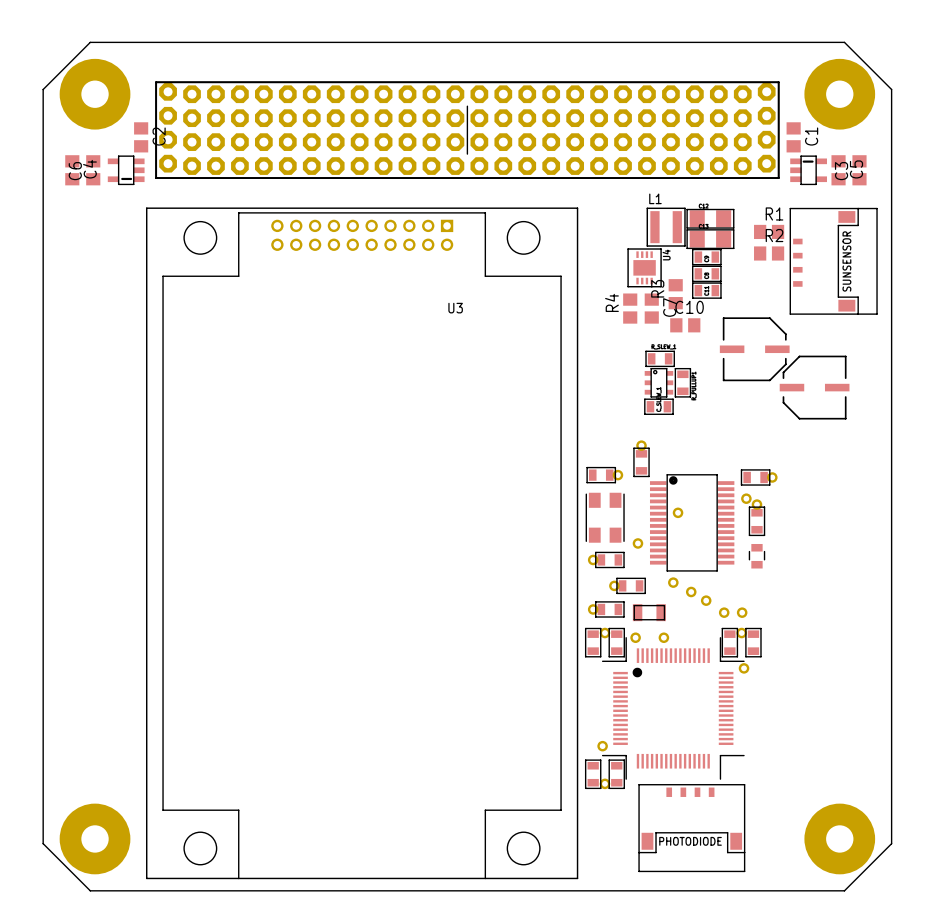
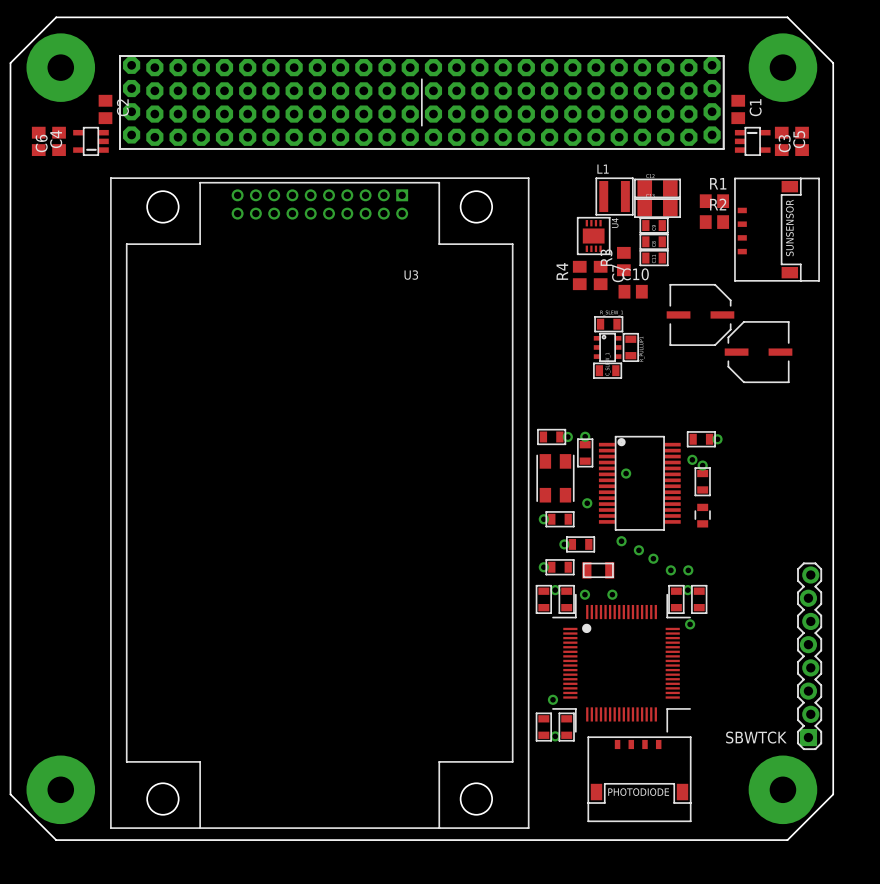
part: (681, 614) -> none
part: none -> (629, 585)
part: none -> (809, 656)

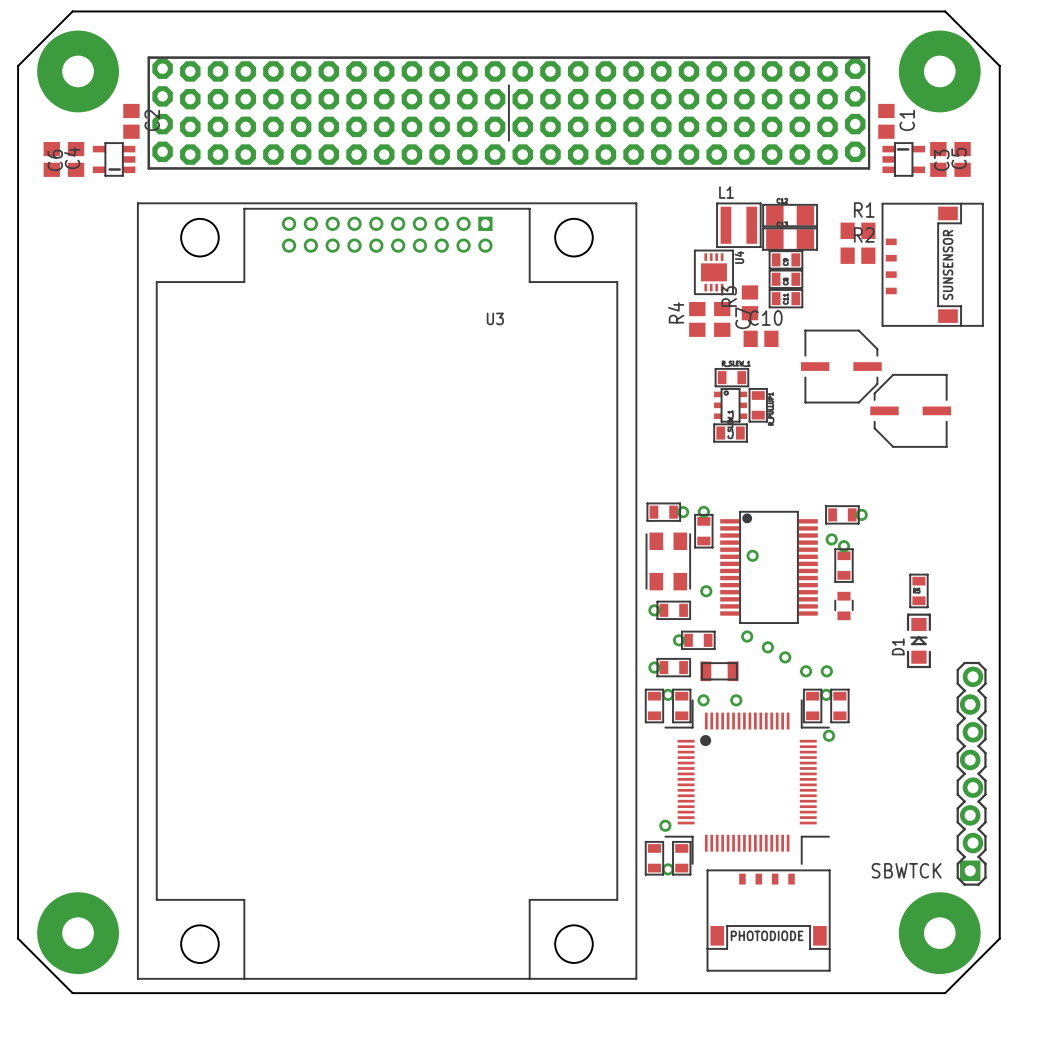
part: none -> (918, 590)
D1: none -> (918, 640)

